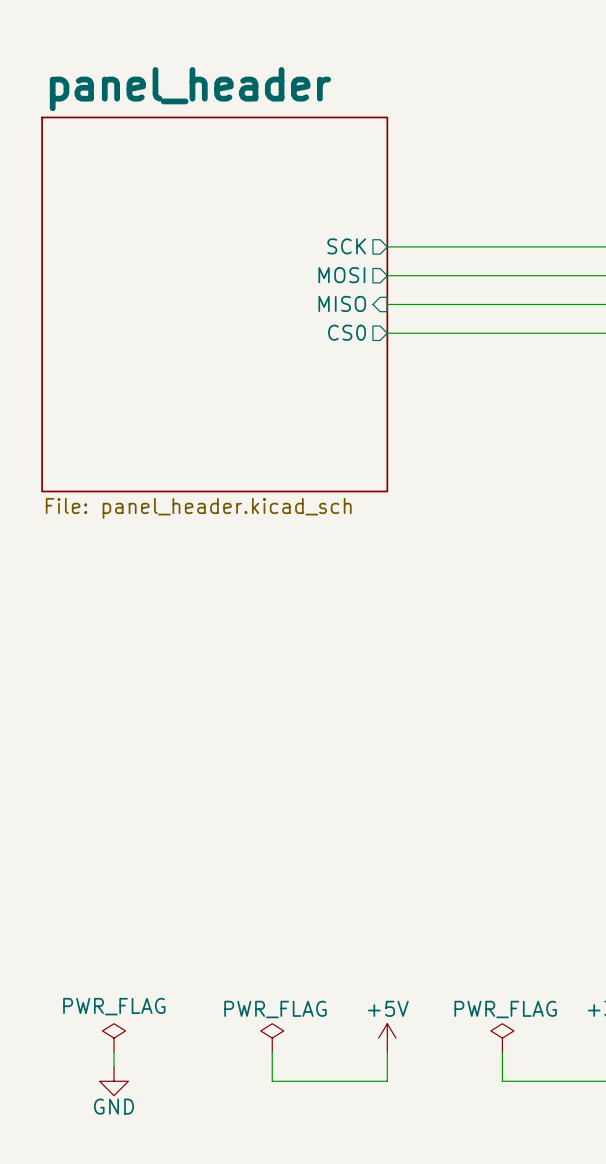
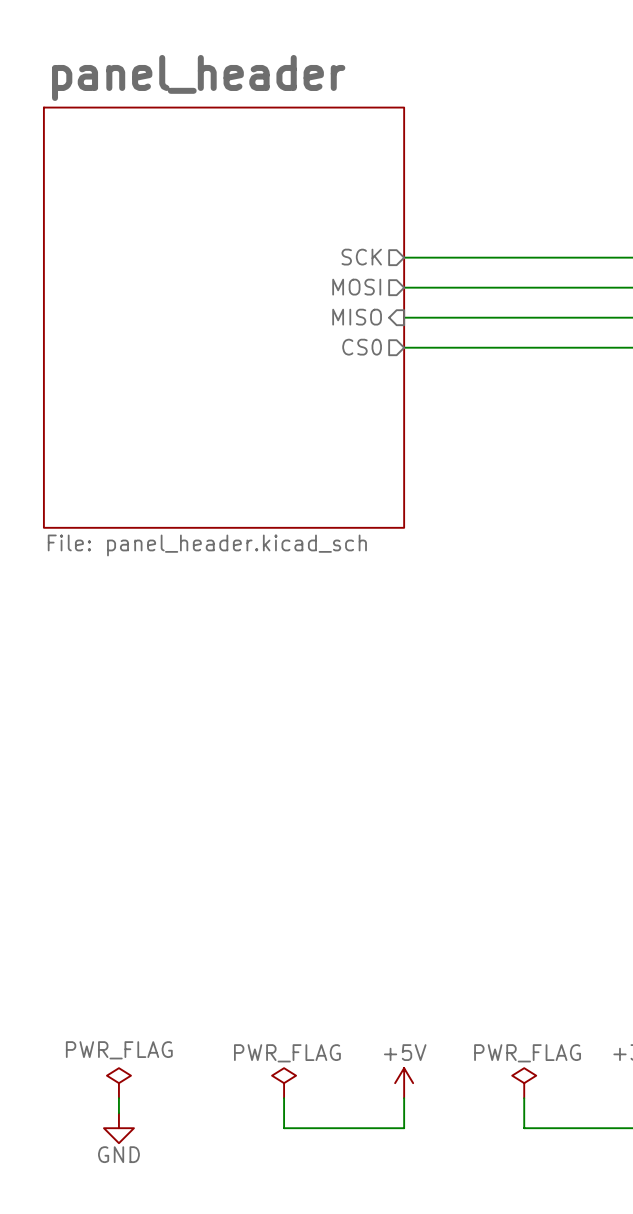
sheet panel_header shape: [41, 116, 389, 493] -> [43, 106, 406, 529]

